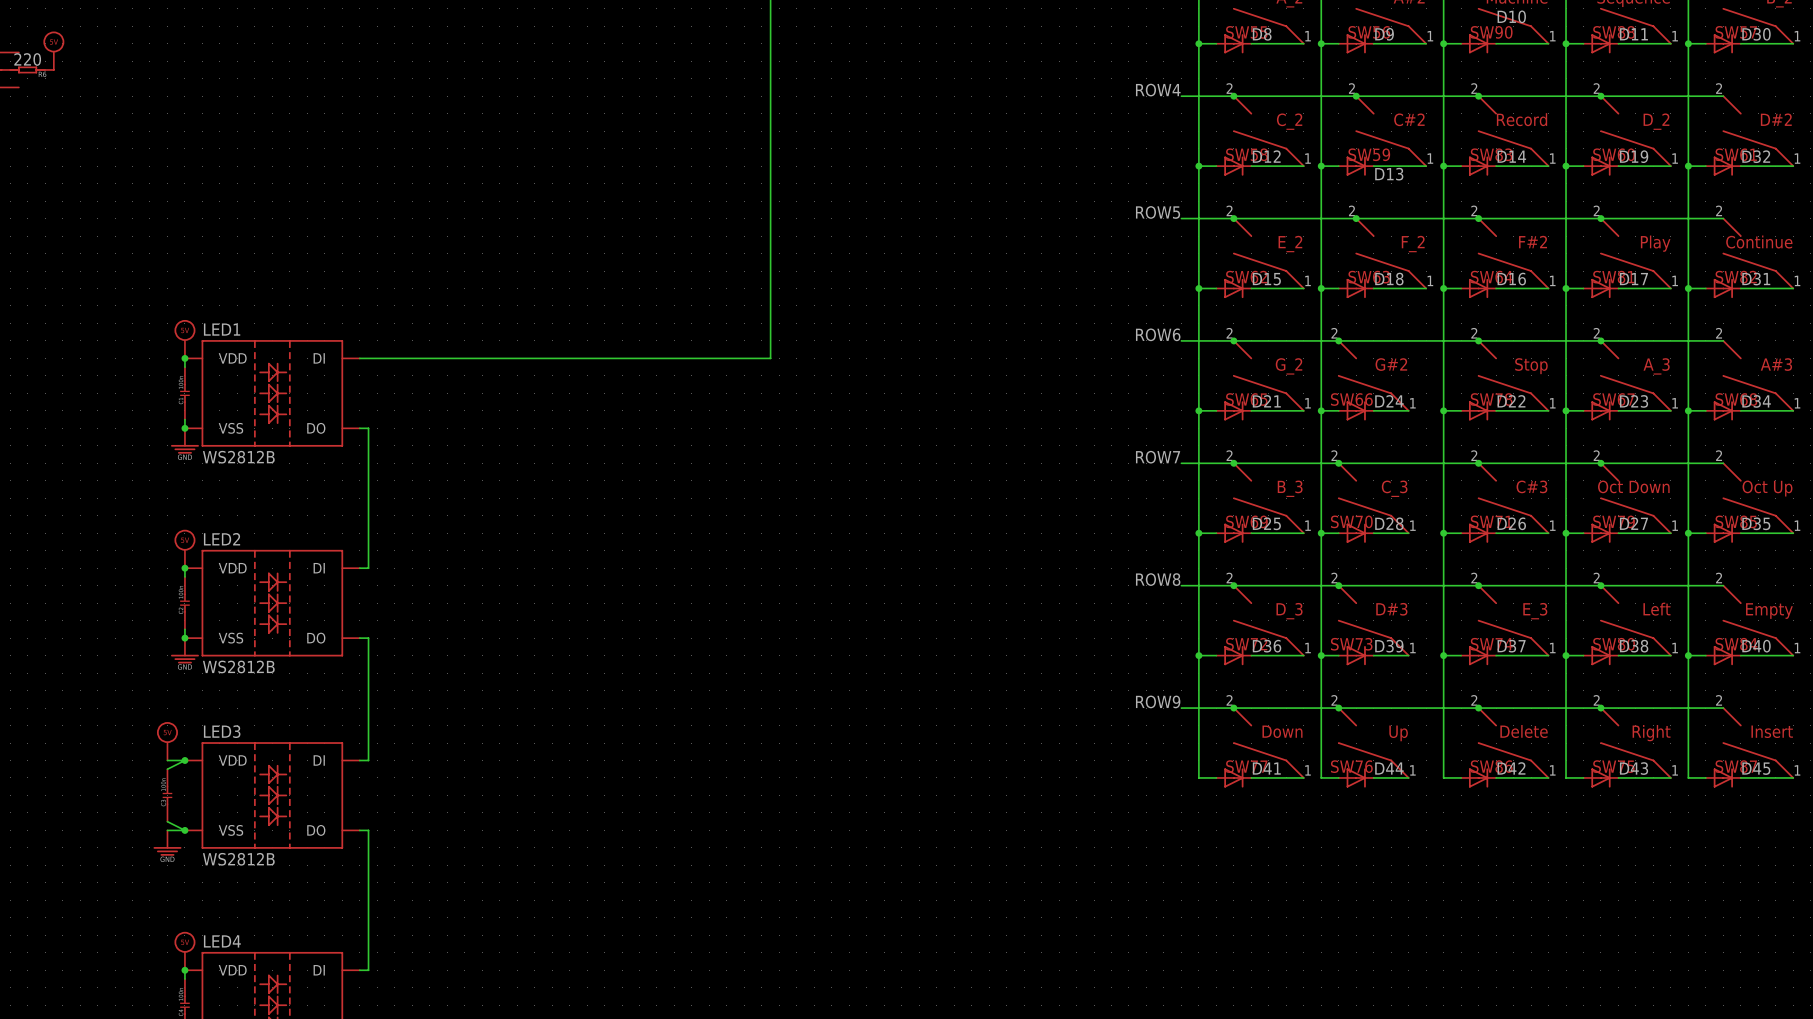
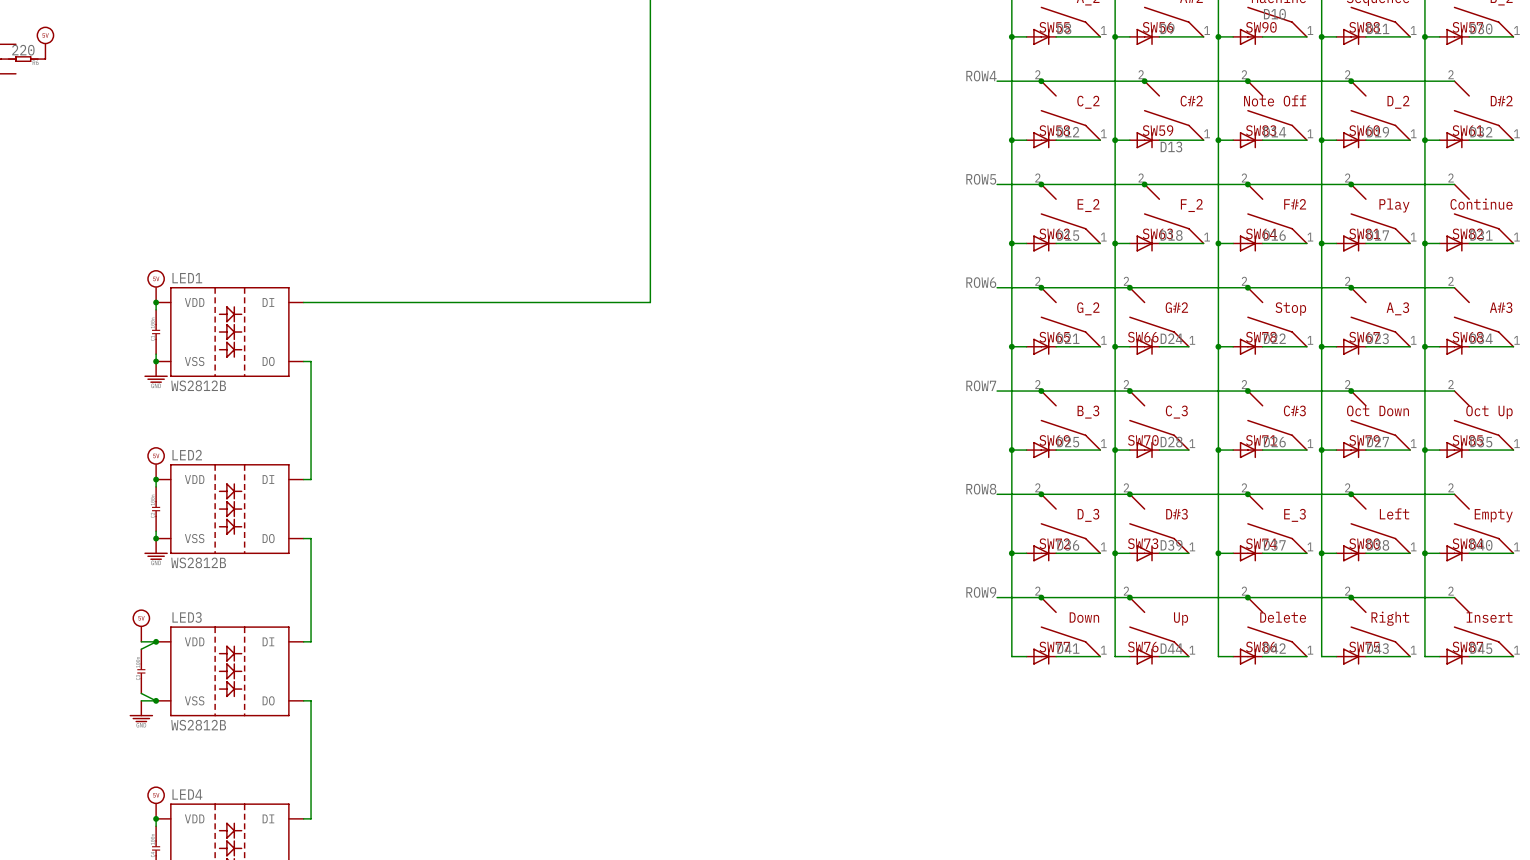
SW83 value: Record (1522, 119) -> Note Off (1275, 100)

